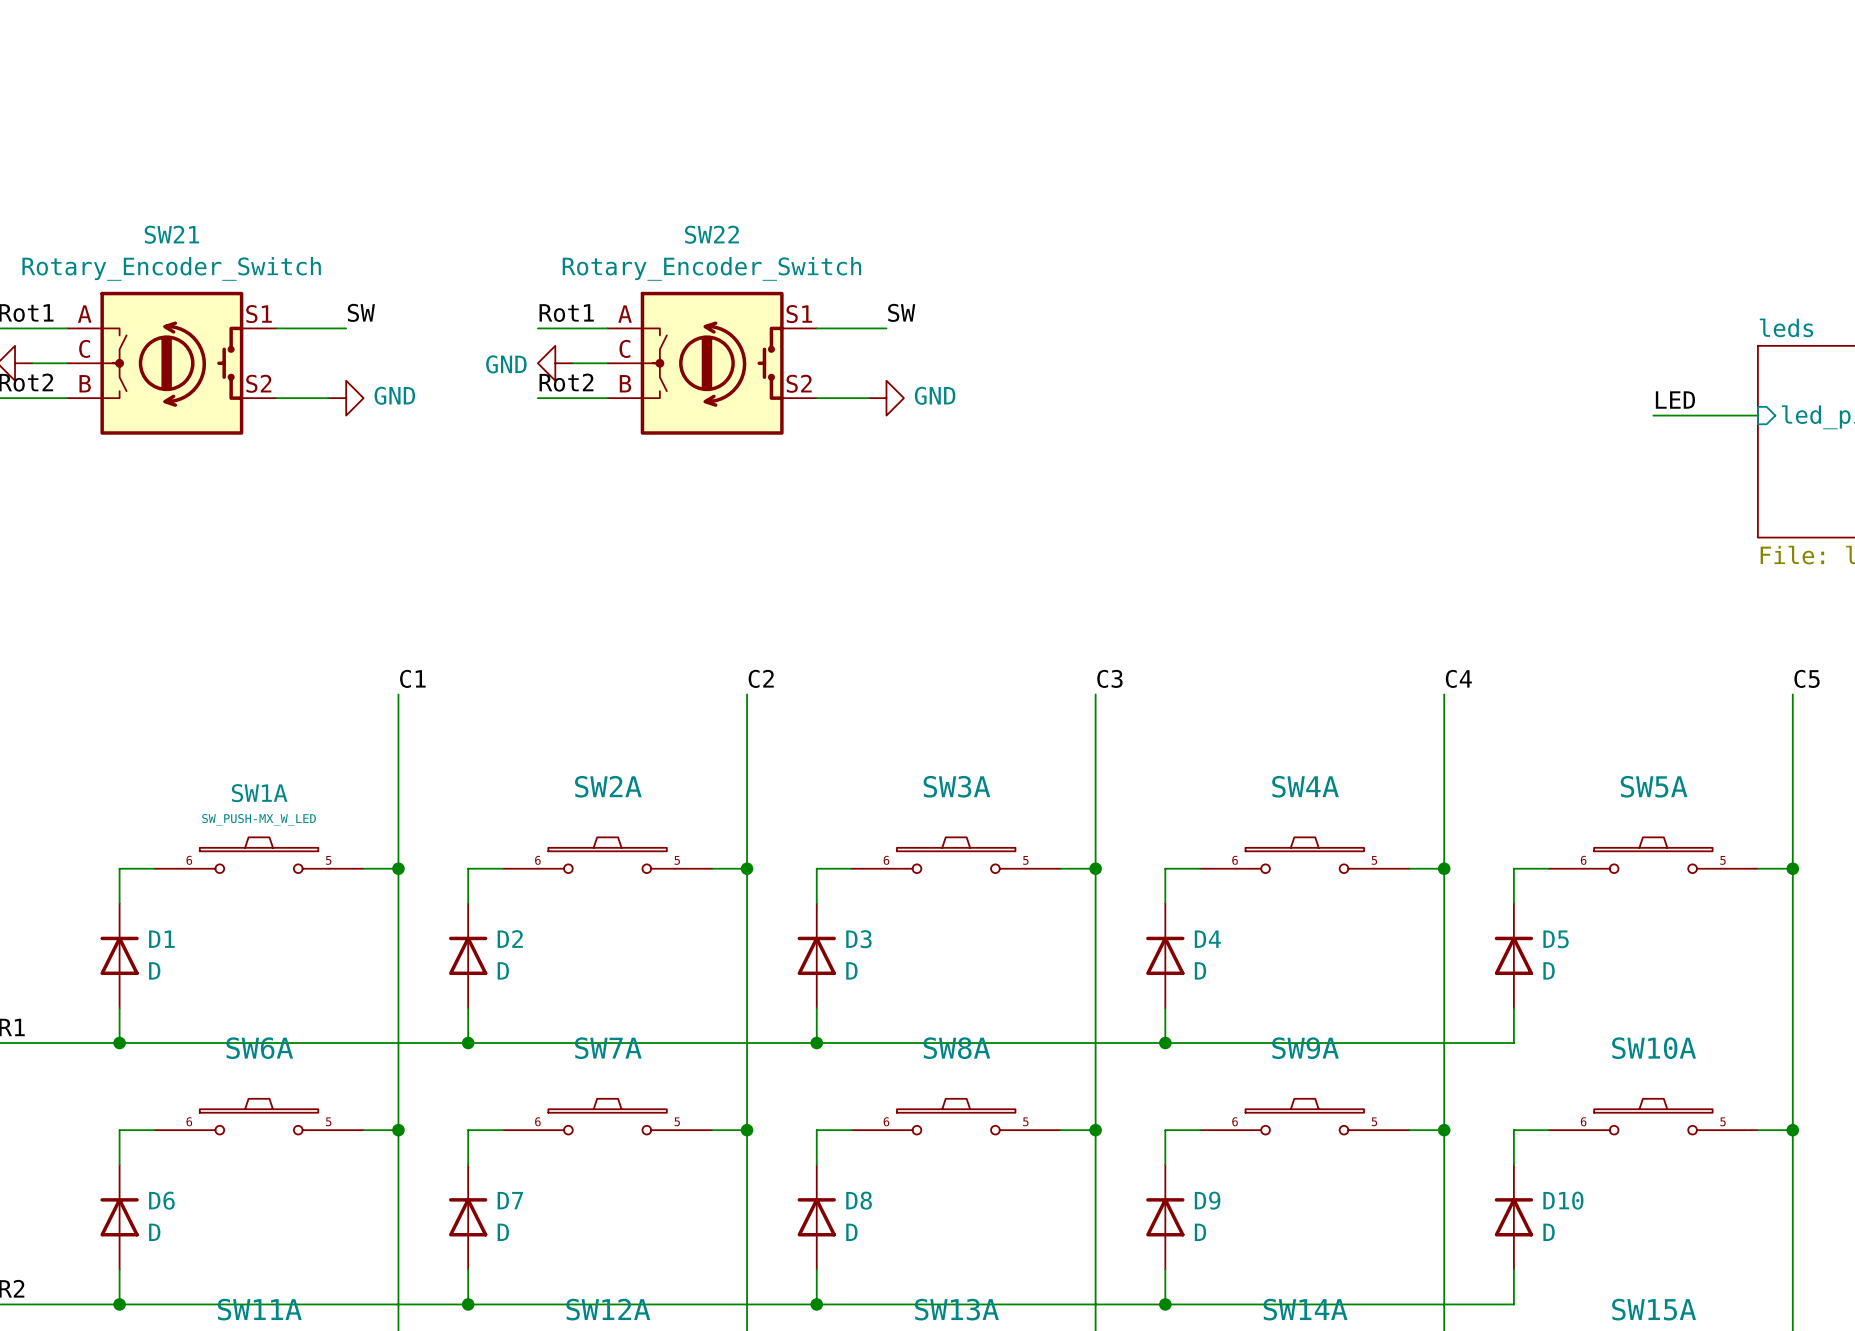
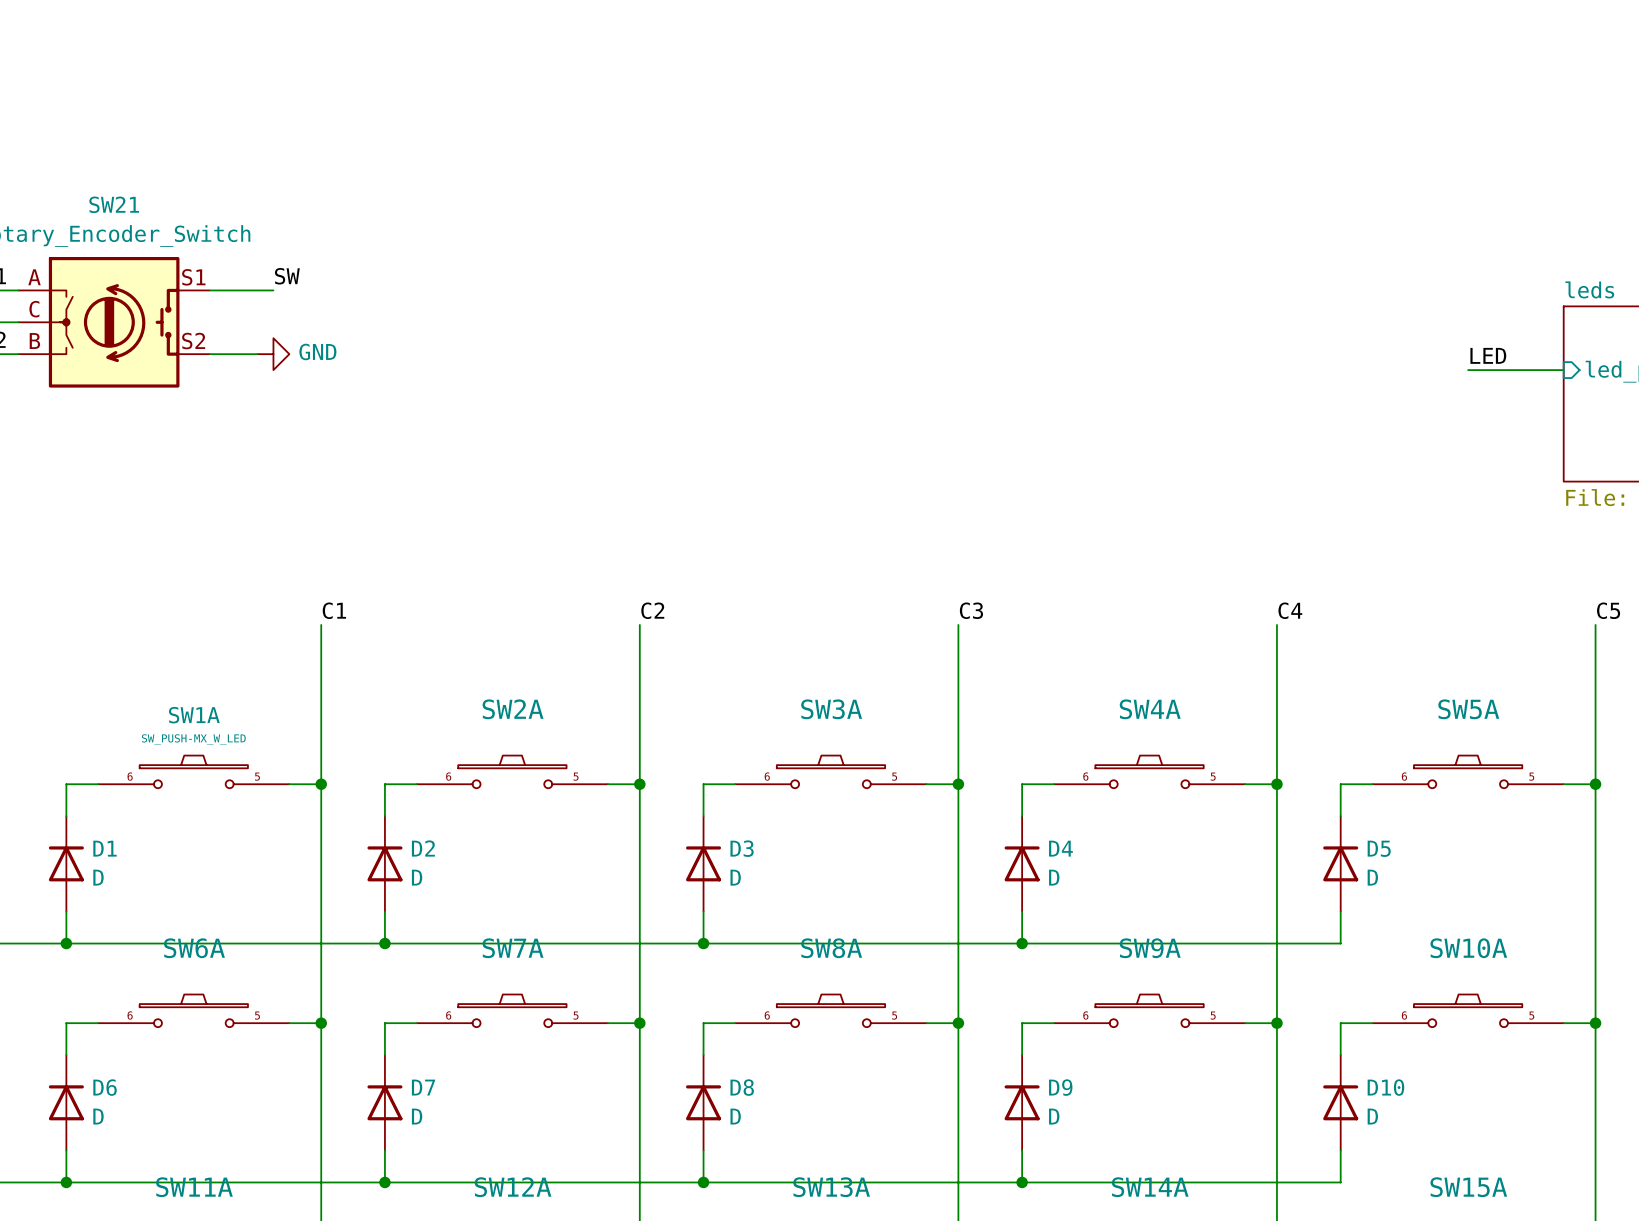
label: SW (901, 312) -> none
label: Rot1 (566, 313) -> none
wire: (537, 328) (607, 328) -> none
wire: (816, 328) (886, 328) -> none
power symbol: GND (555, 363) -> none
wire: (572, 363) (607, 363) -> none
SW22: Rotary_Encoder_Switch (712, 363) -> none
label: Rot2 (566, 382) -> none
wire: (537, 398) (607, 398) -> none
wire: (816, 398) (869, 398) -> none
power symbol: GND (886, 398) -> none

